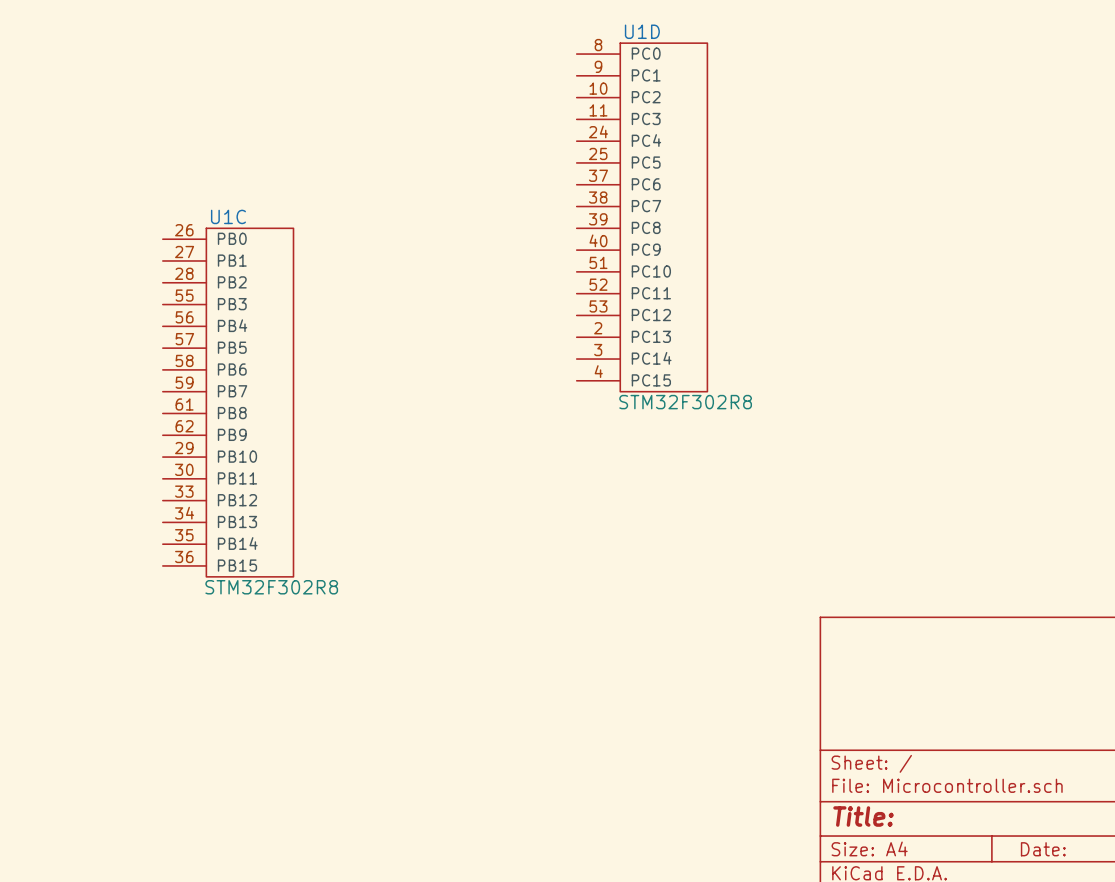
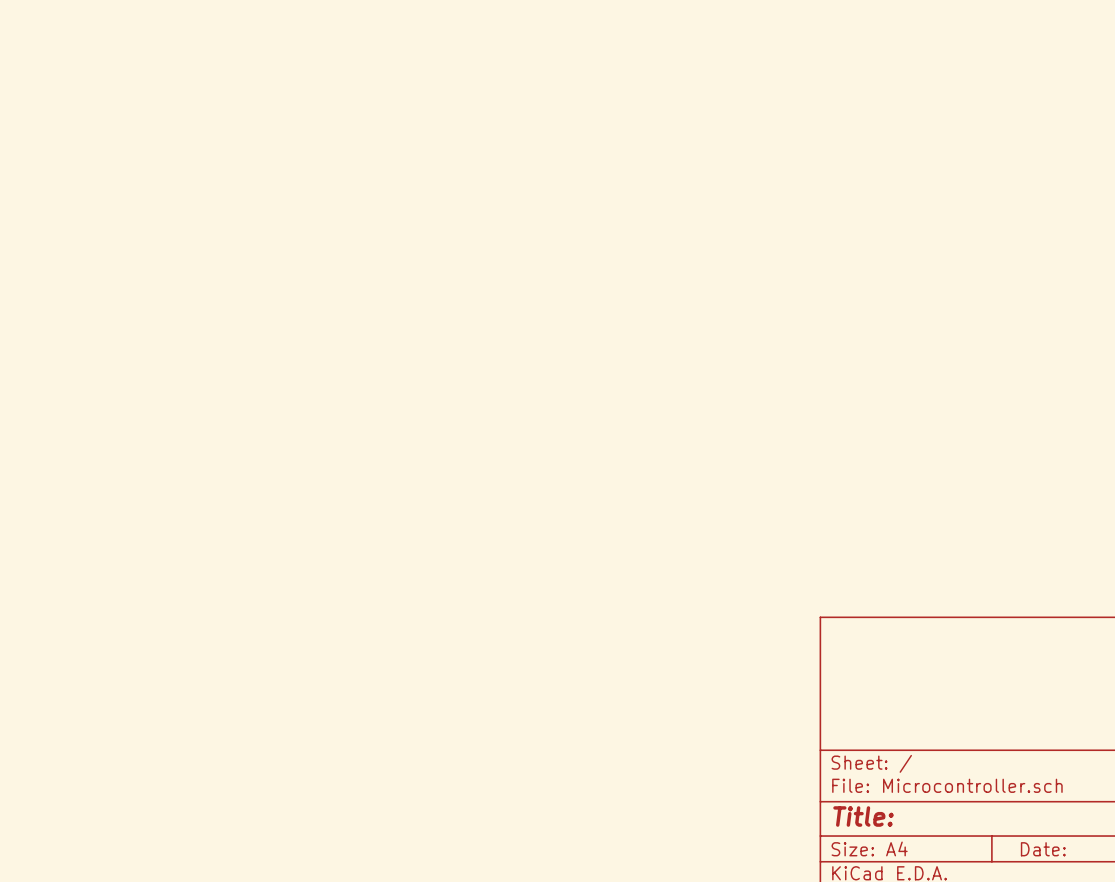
U1D: STM32F302R8 (821, 217) -> none
U1C: STM32F302R8 (407, 402) -> none

